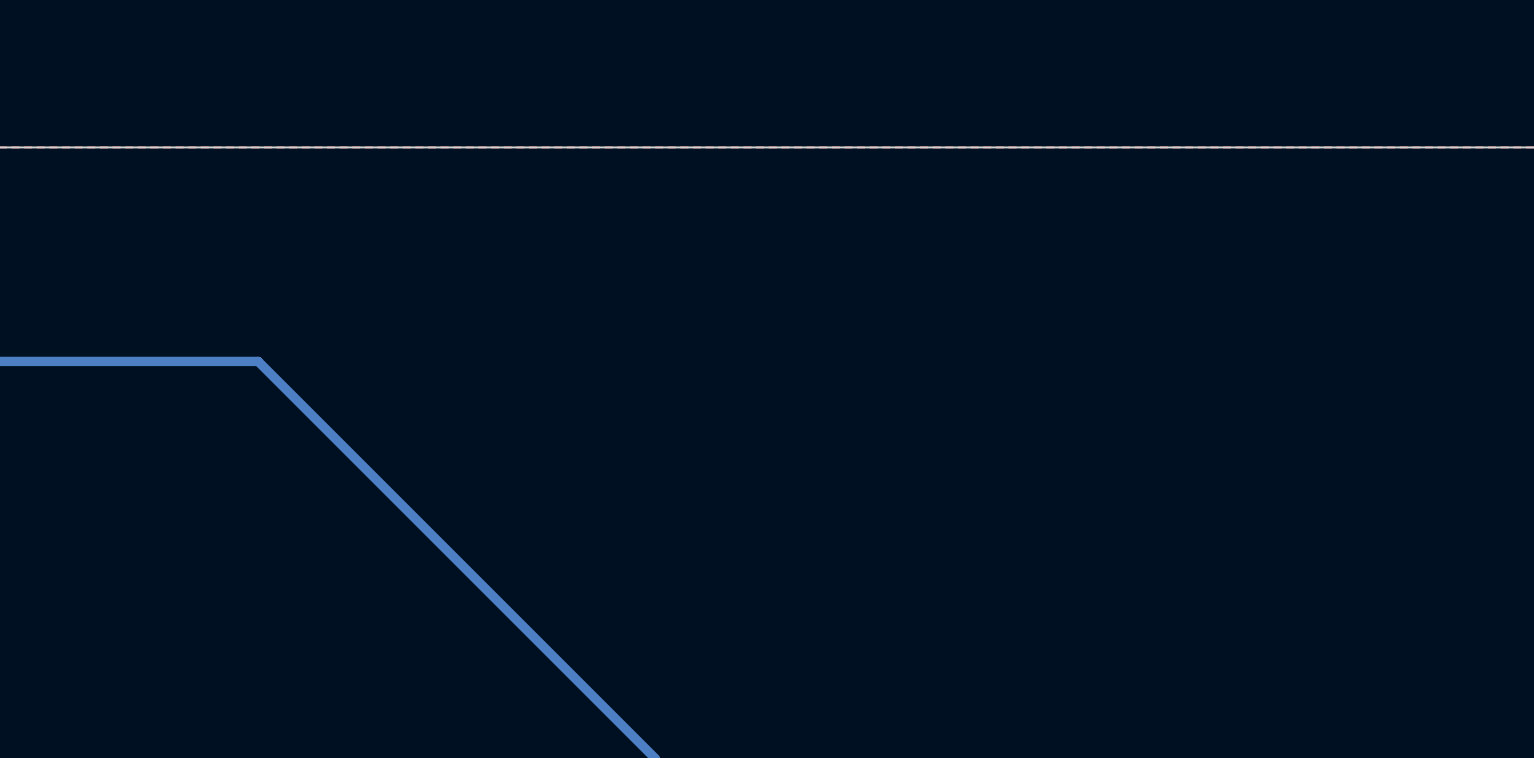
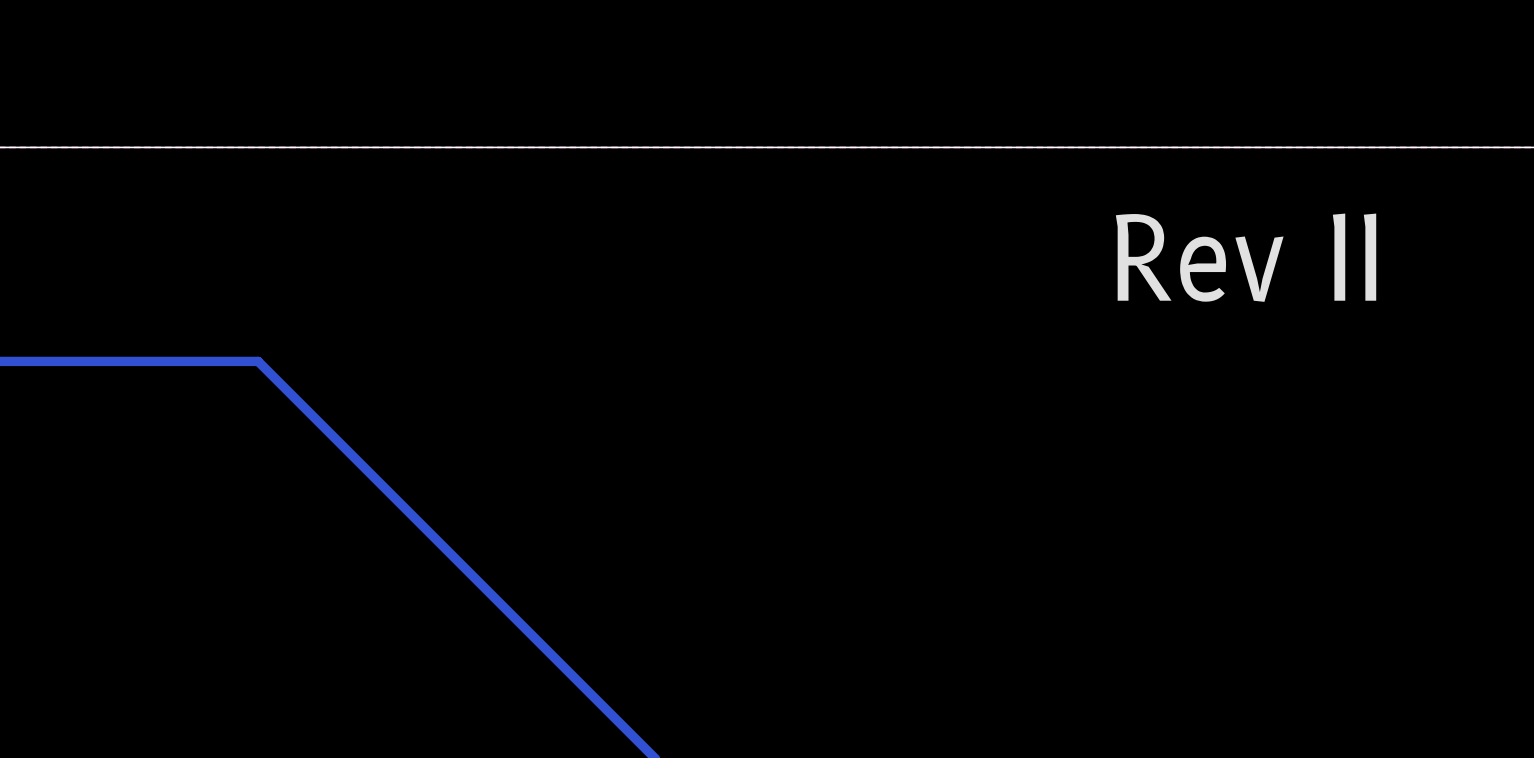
text: none -> Rev II (1246, 257)

